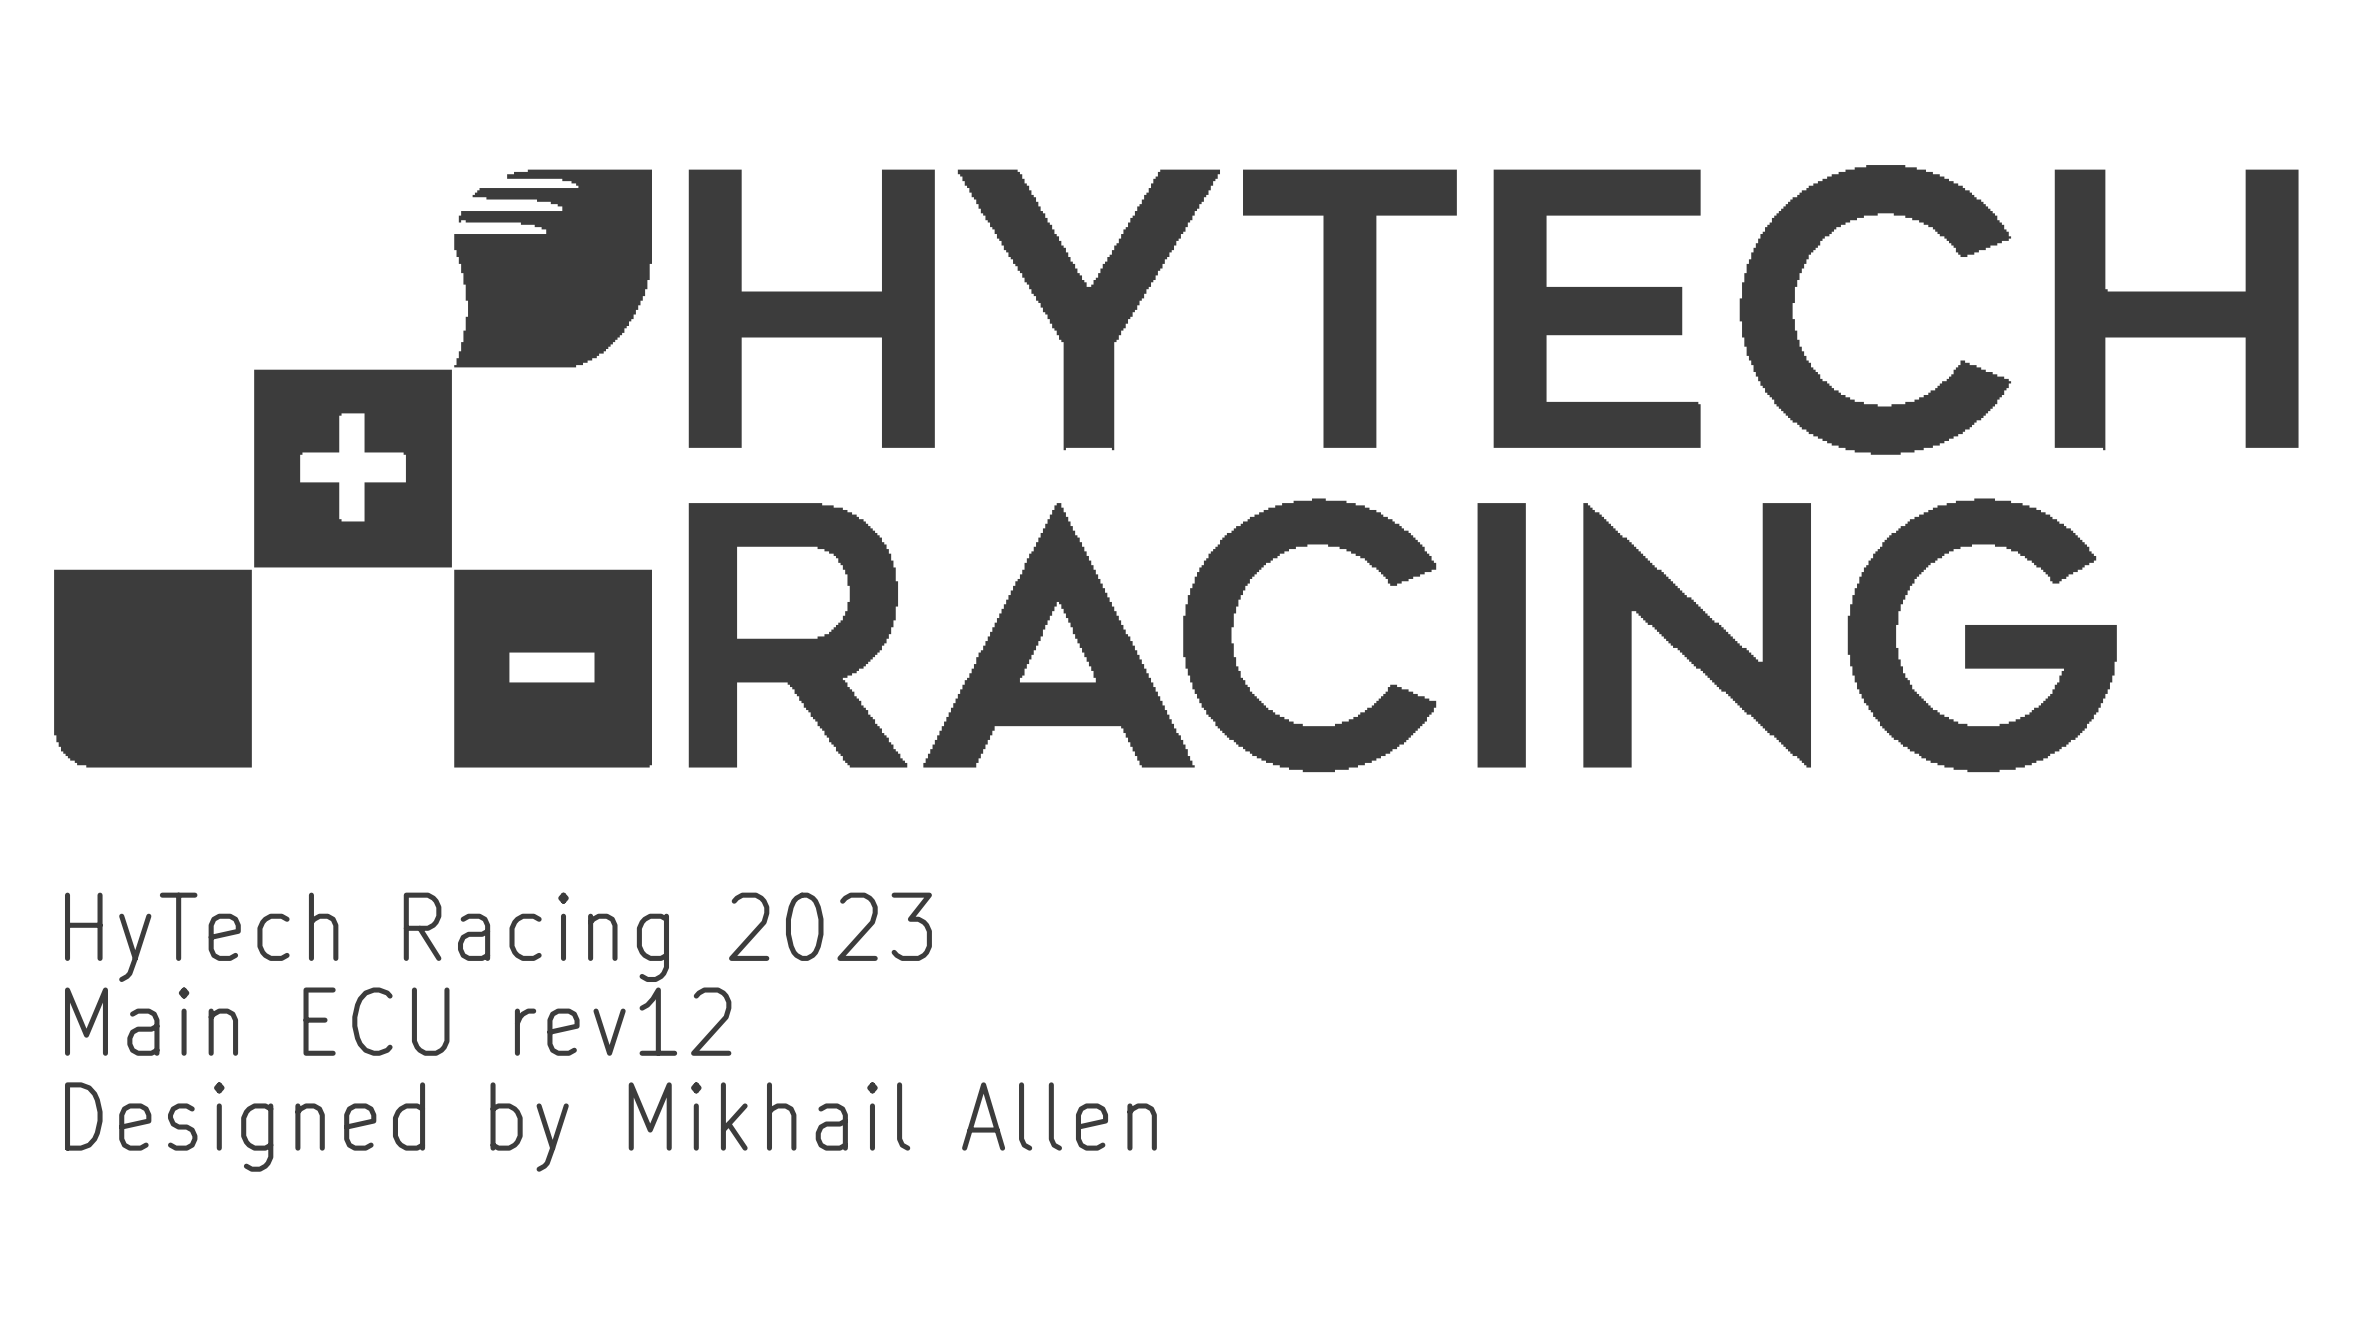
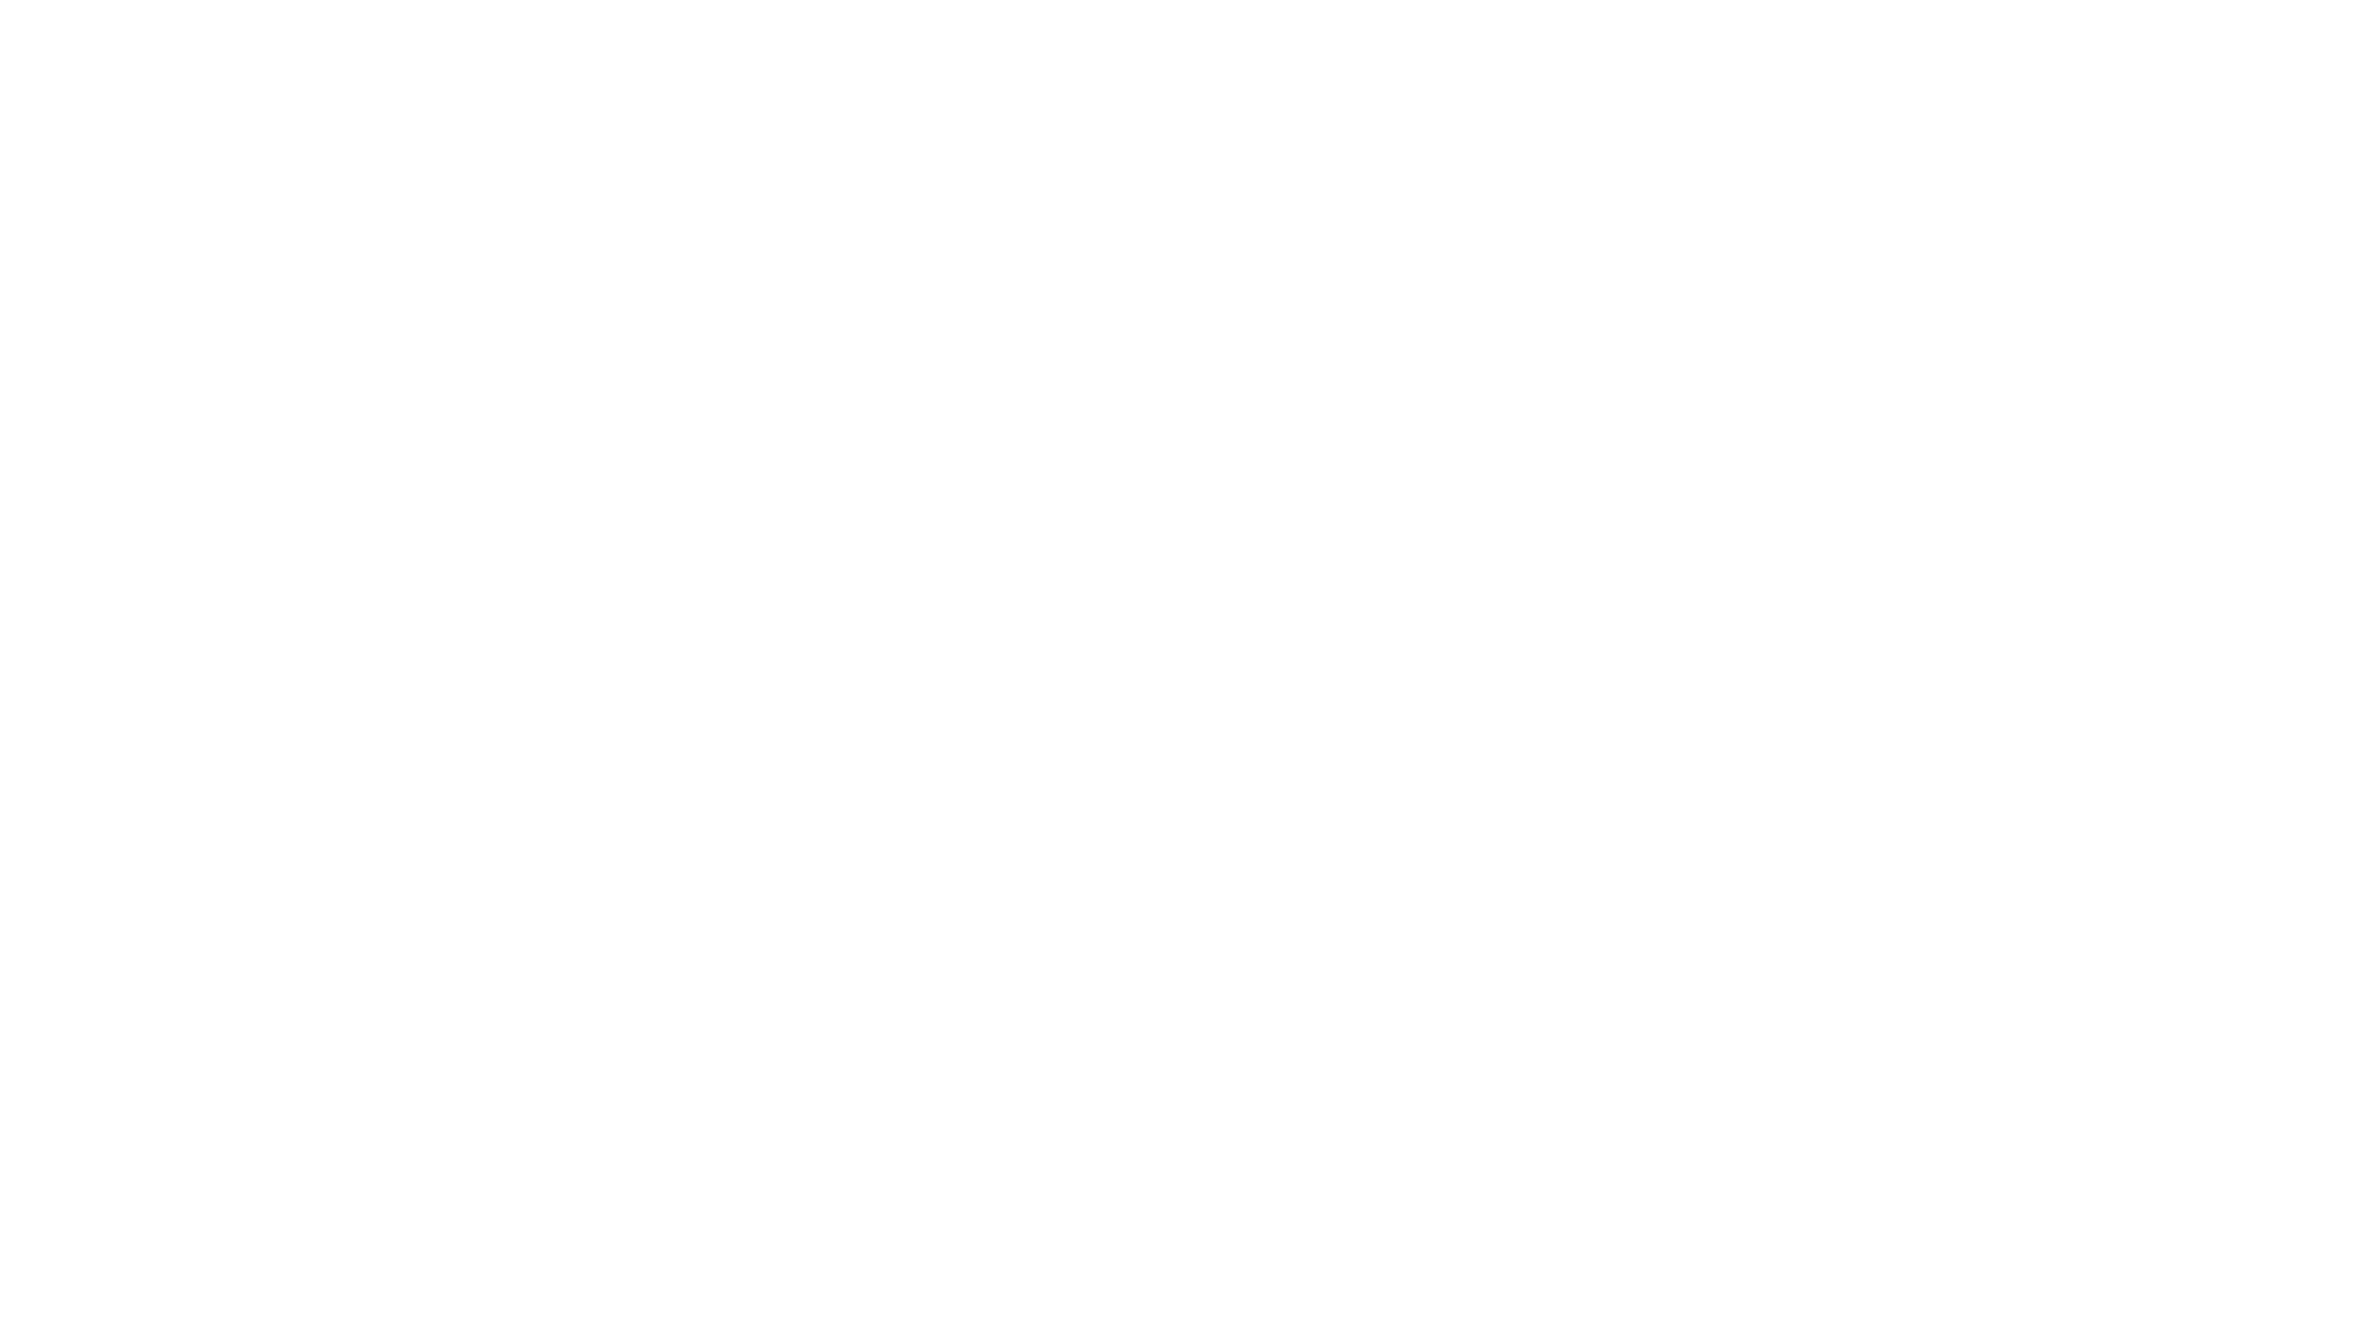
drawing: [54, 165, 2299, 773] -> none
text: HyTech Racing 2023 (498, 937) -> none
text: Main ECU rev12 (398, 1021) -> none
text: Designed by Mikhail Allen (610, 1127) -> none

